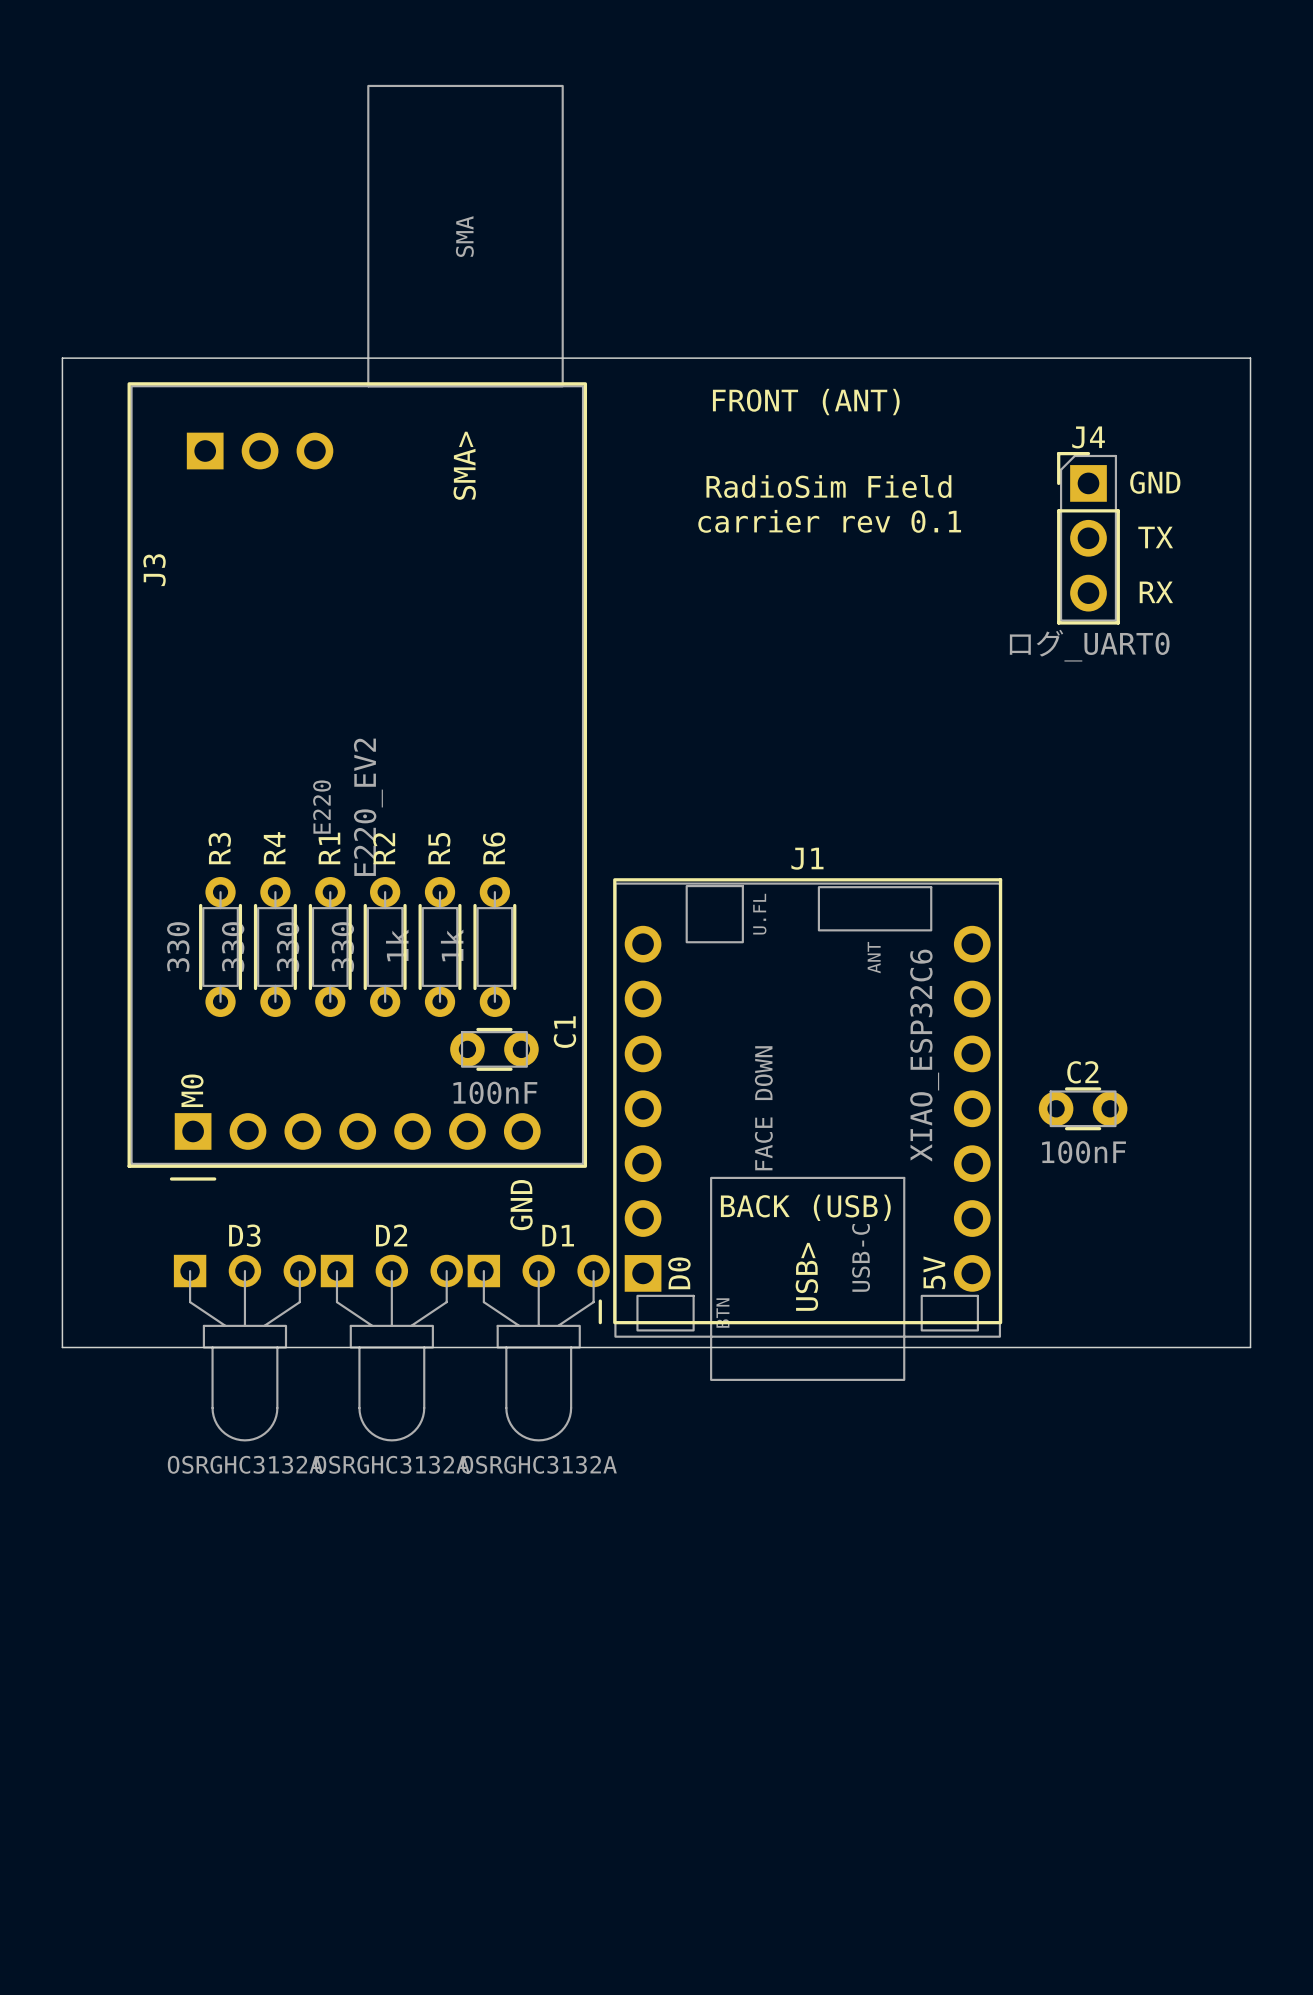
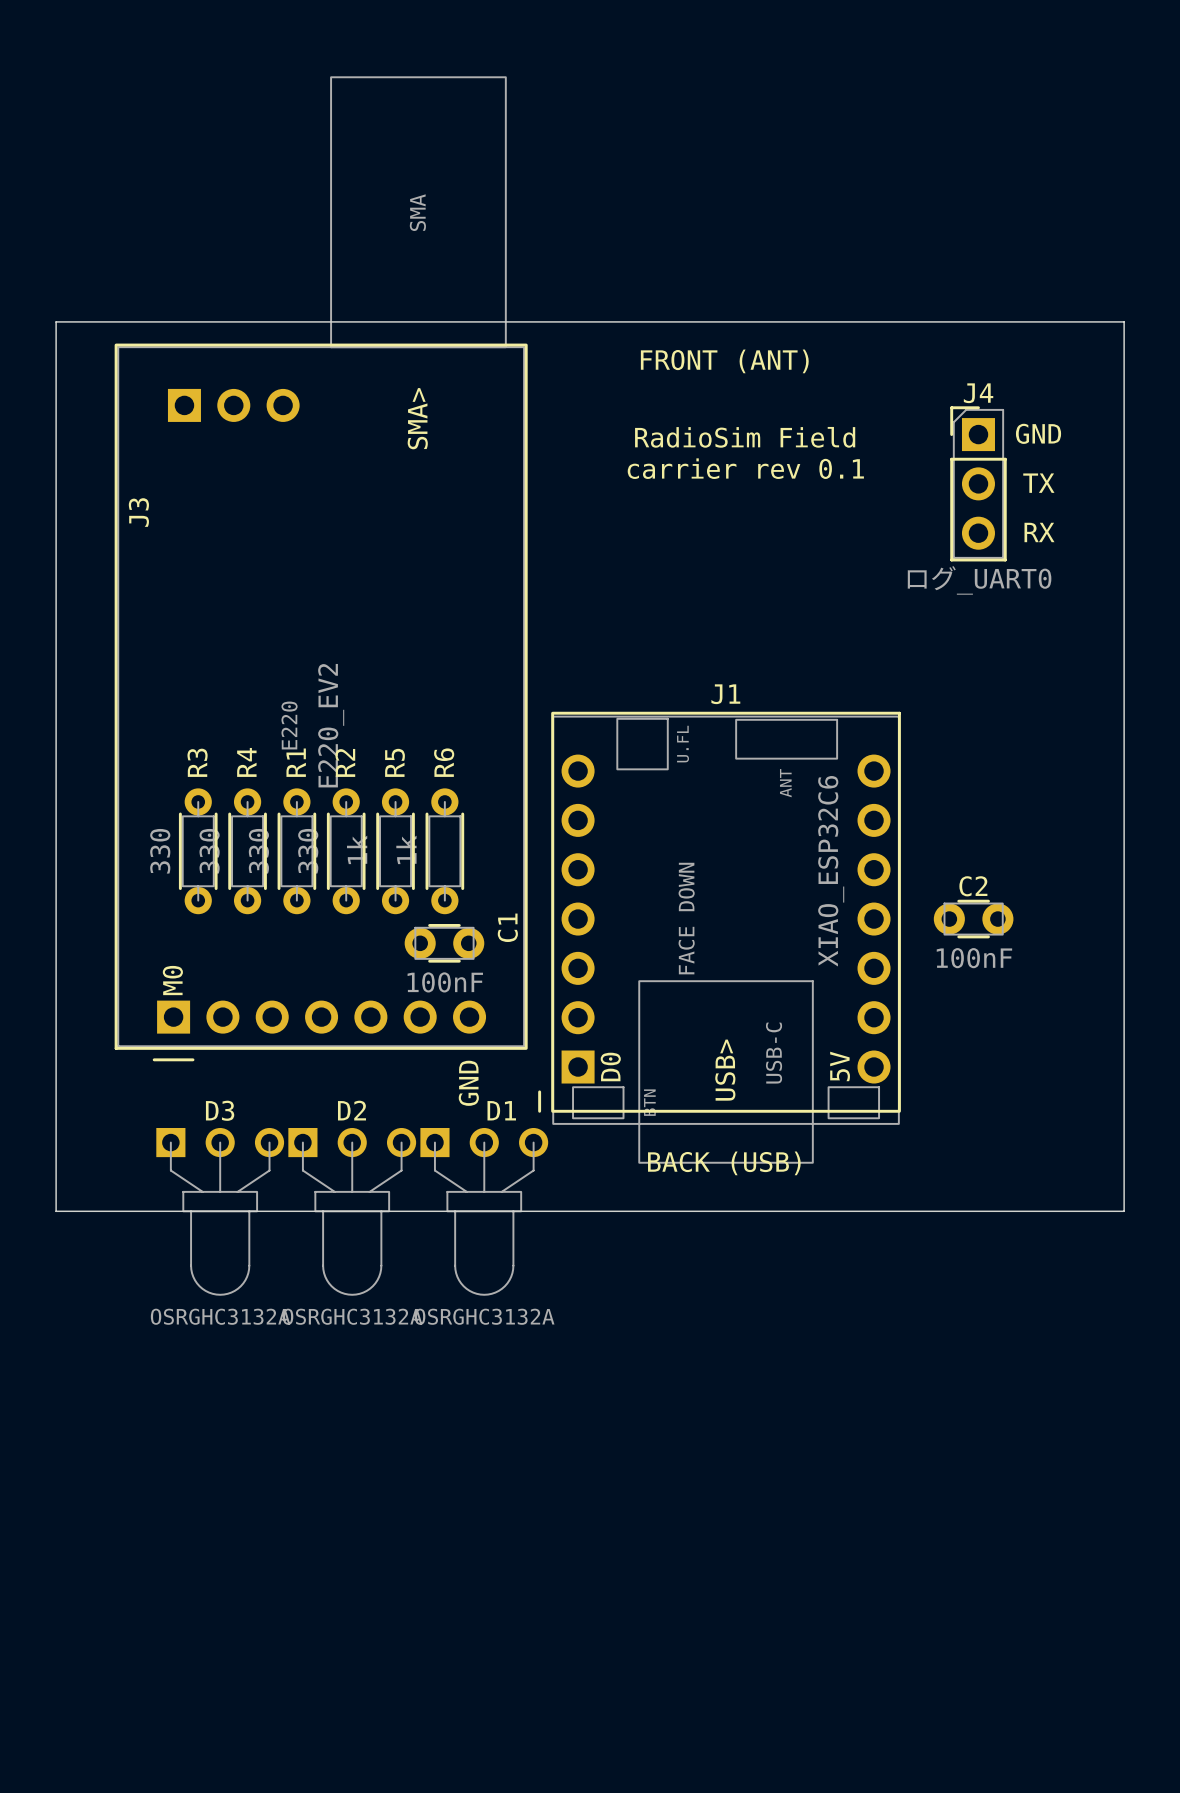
C2 position: (1083, 1108) -> (973, 919)
J1 position: (800, 1129) -> (719, 937)
text position: BACK (USB) (805, 1207) -> BACK (USB) (724, 1163)

